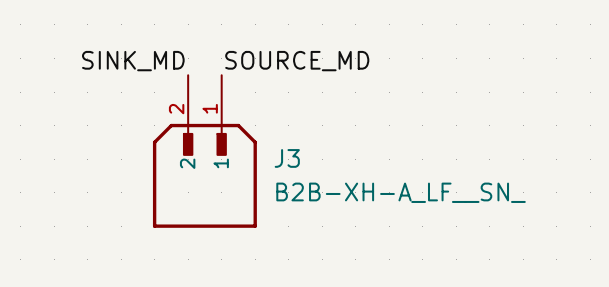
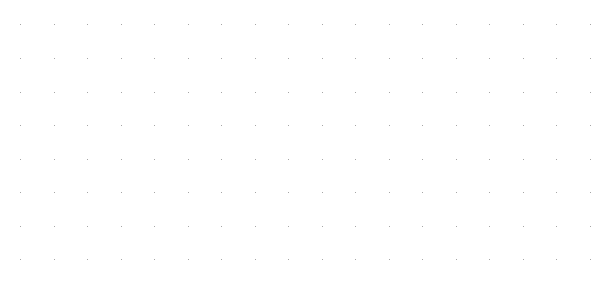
label: SINK_MD (133, 61) -> none
label: SOURCE_MD (297, 61) -> none
J3: B2B-XH-A_LF__SN_ (204, 151) -> none

